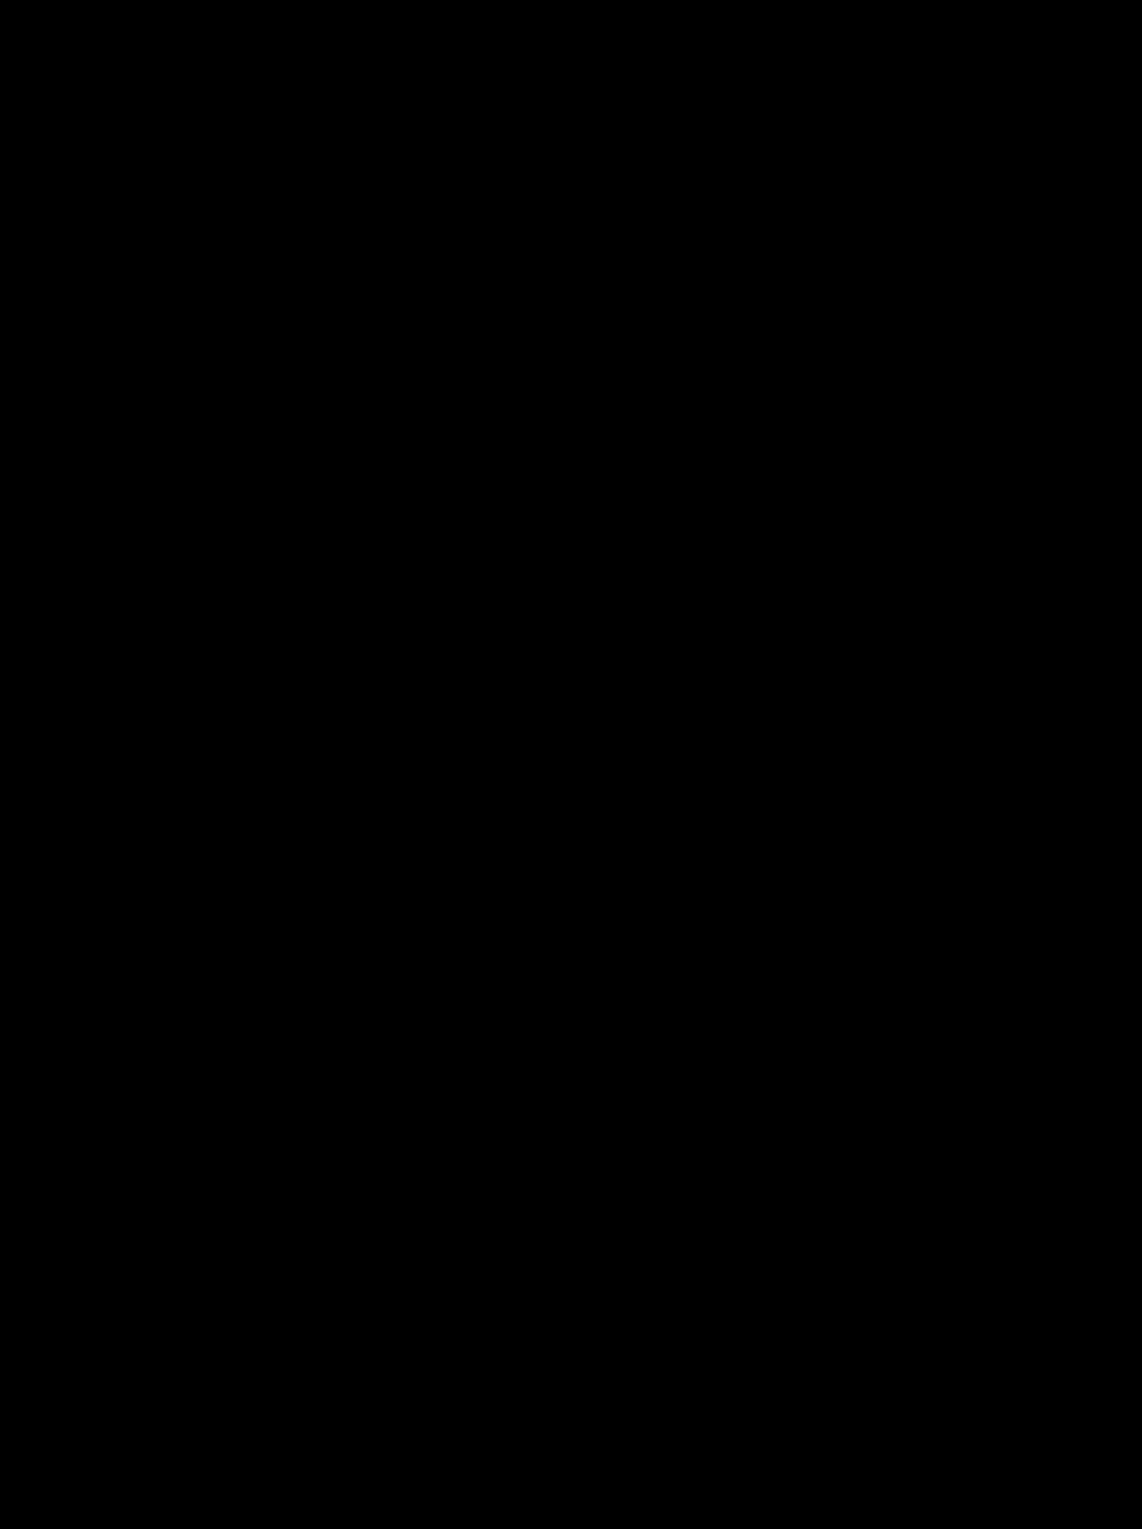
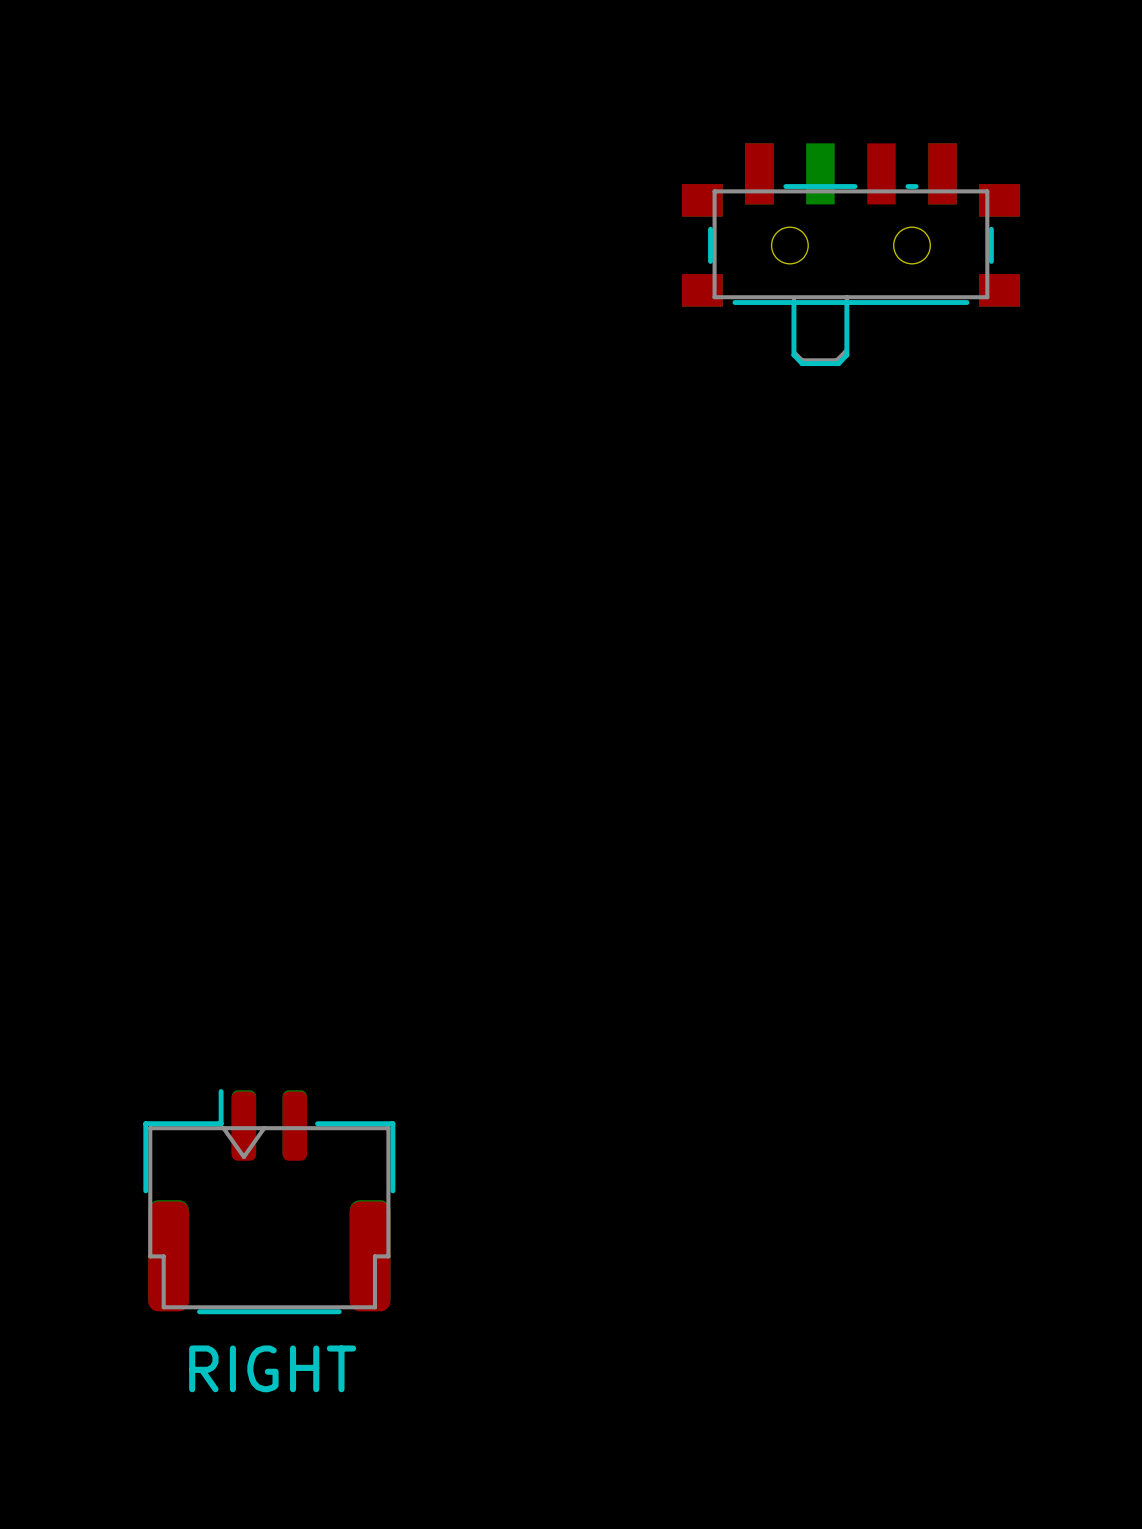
part: none -> (850, 254)
part: none -> (269, 1201)

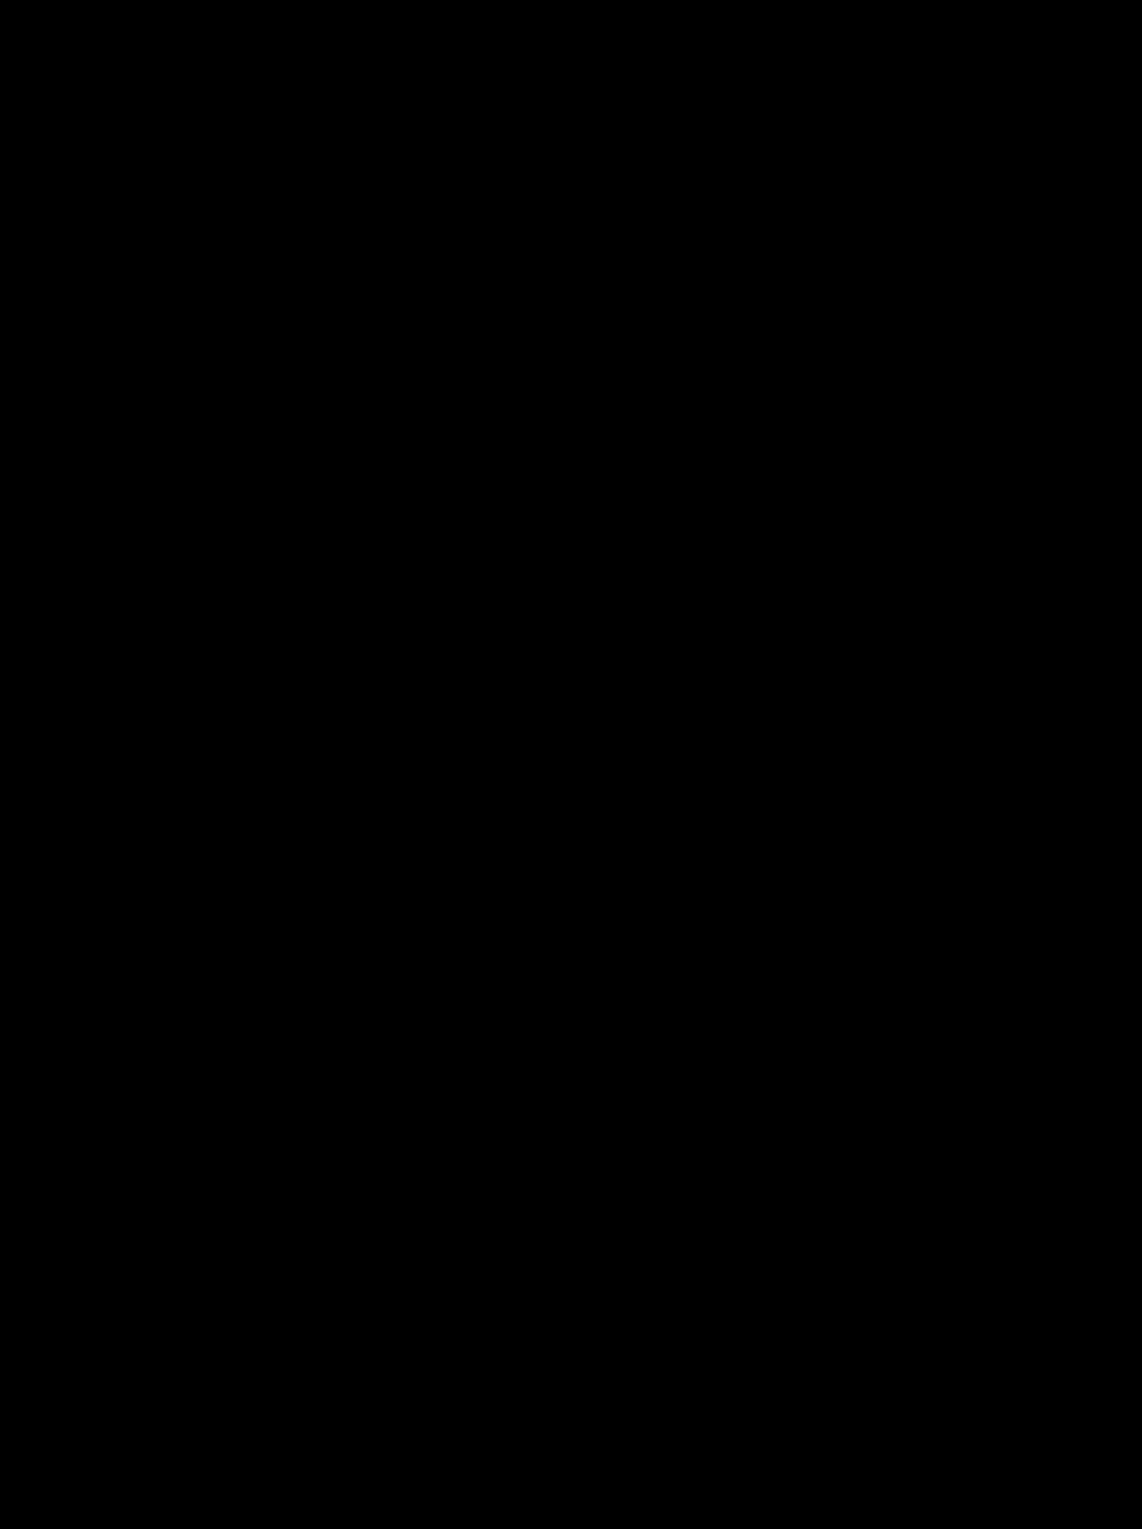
part: (850, 254) -> none
part: (269, 1201) -> none

